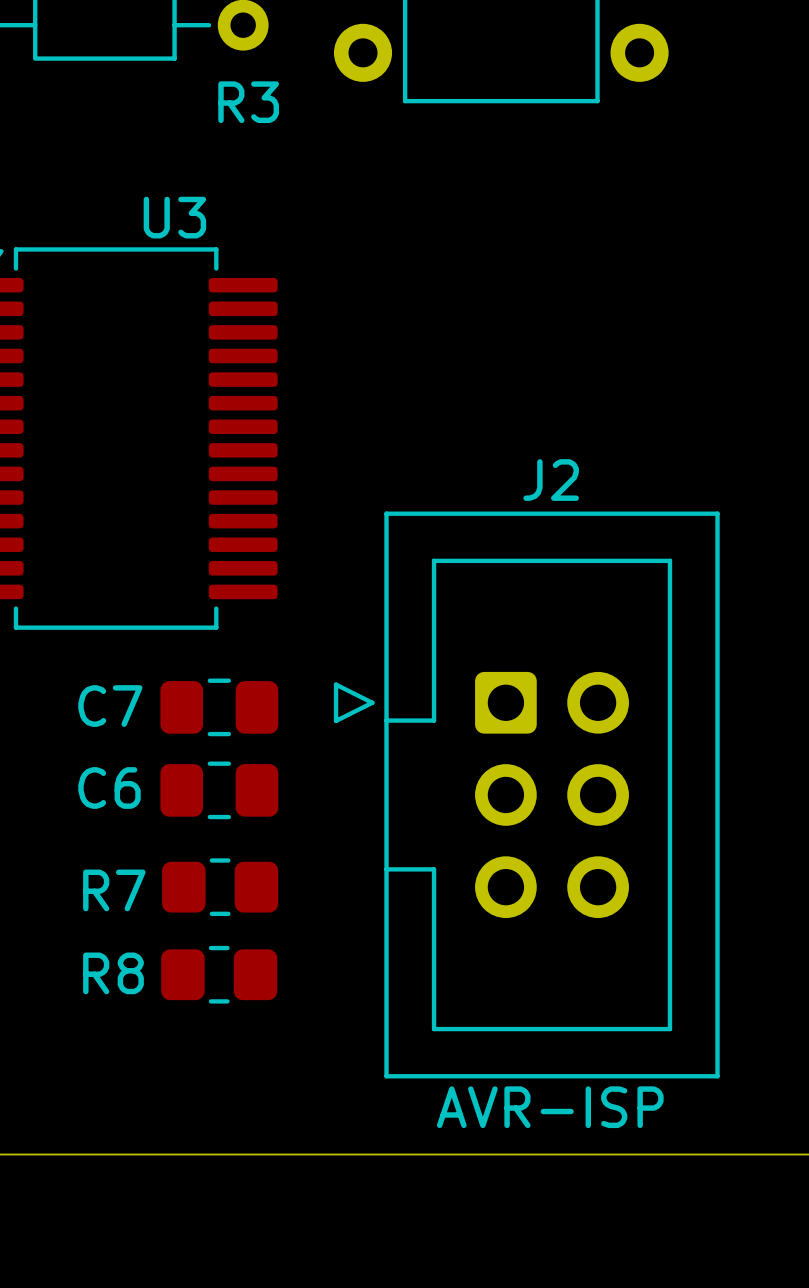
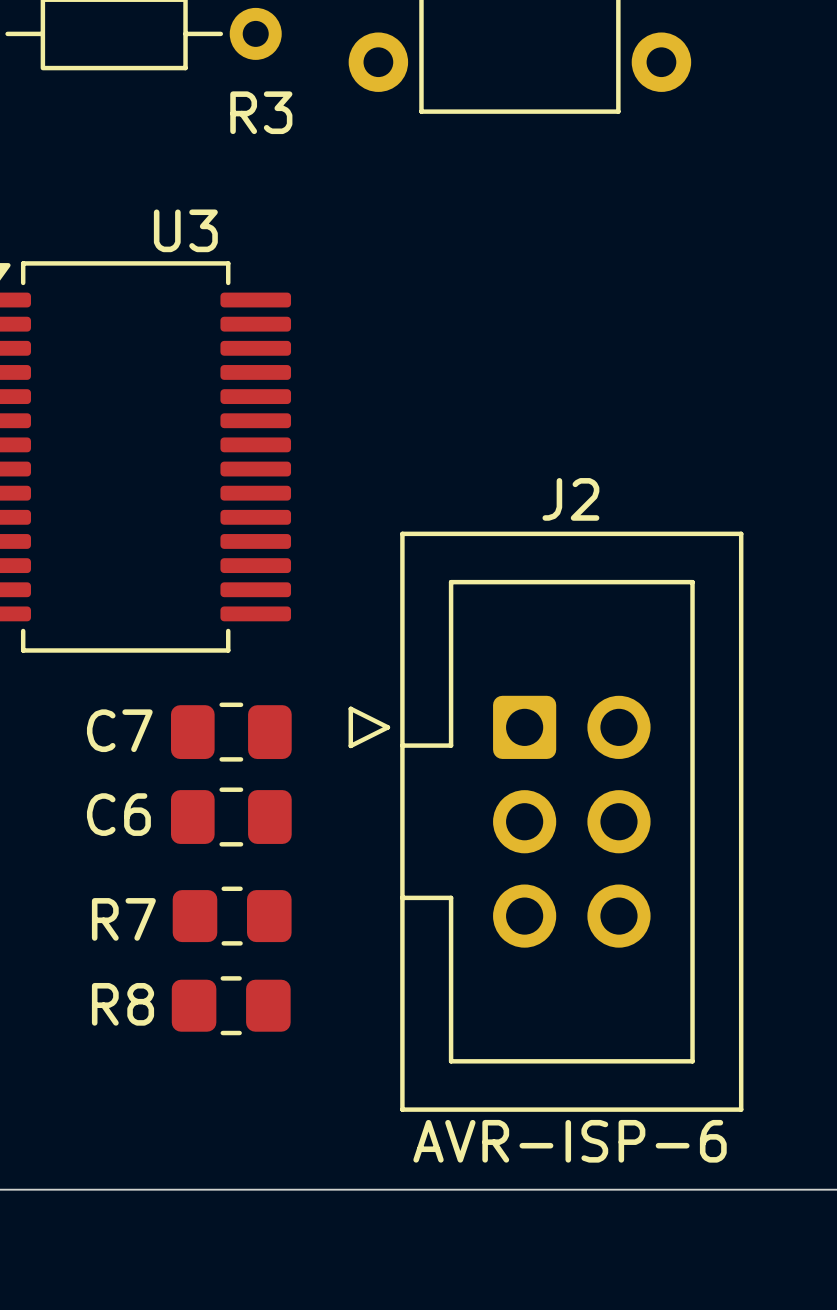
J2 value: AVR-ISP (550, 1107) -> AVR-ISP-6 (570, 1141)

